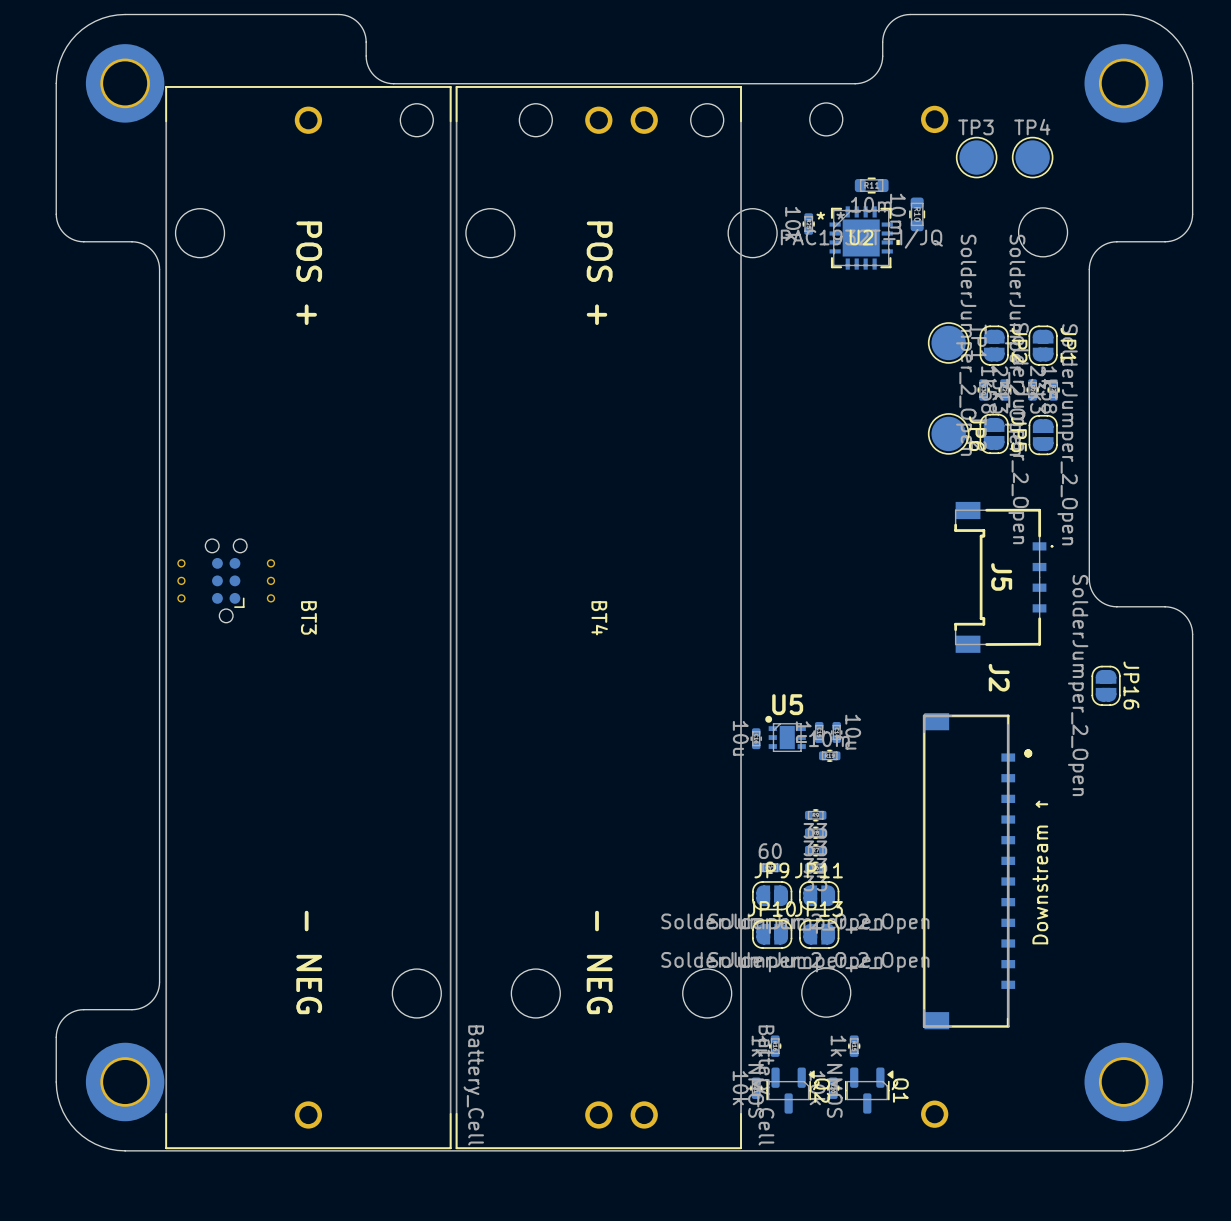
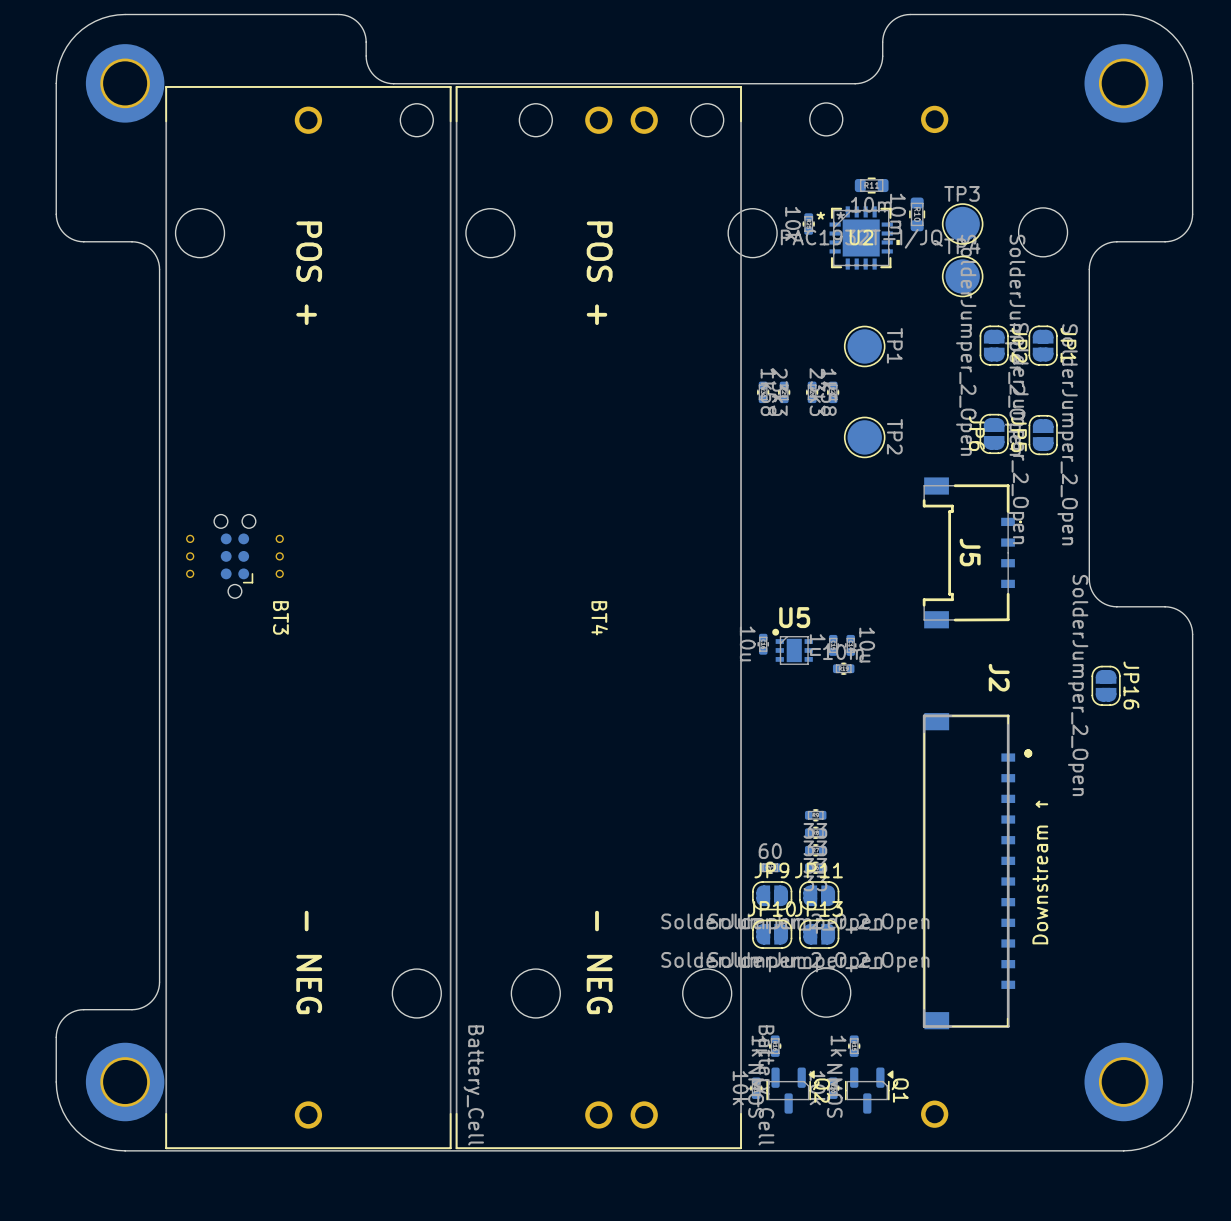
TP3 position: (976, 157) -> (962, 224)
TP4 position: (1032, 157) -> (962, 276)
TP1 position: (948, 342) -> (864, 346)
part position: (983, 389) -> (763, 392)
part position: (1032, 389) -> (812, 392)
part position: (1004, 390) -> (784, 392)
part position: (1053, 390) -> (833, 392)
TP2 position: (948, 433) -> (864, 437)
J5 position: (1003, 577) -> (972, 552)
part position: (226, 580) -> (234, 556)
BT3 name position: BT3 (308, 617) -> BT3 (280, 617)
part position: (819, 732) -> (833, 645)
part position: (836, 732) -> (850, 645)
U5 position: (785, 733) -> (792, 646)
part position: (756, 738) -> (763, 644)
part position: (829, 755) -> (843, 668)

